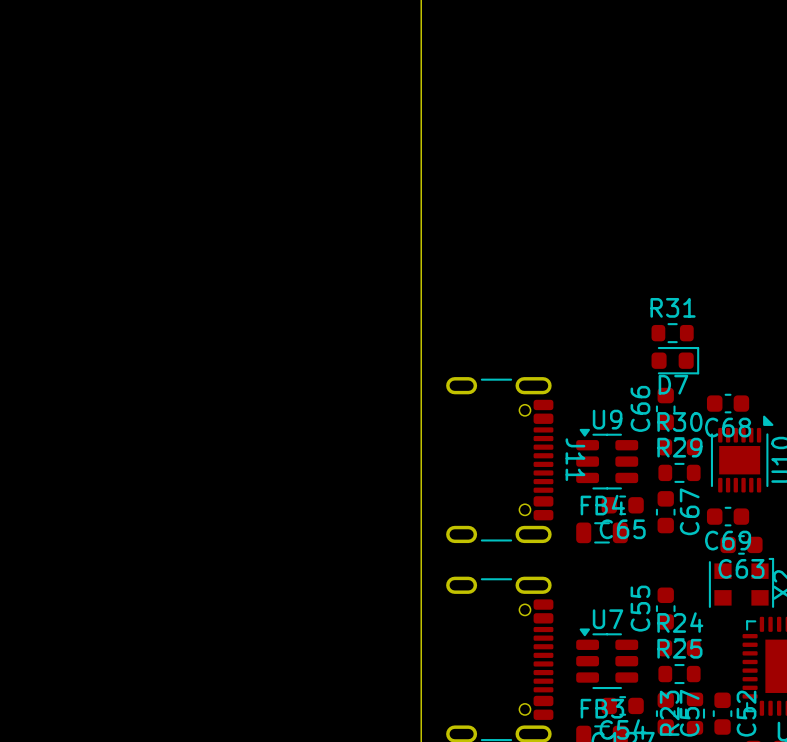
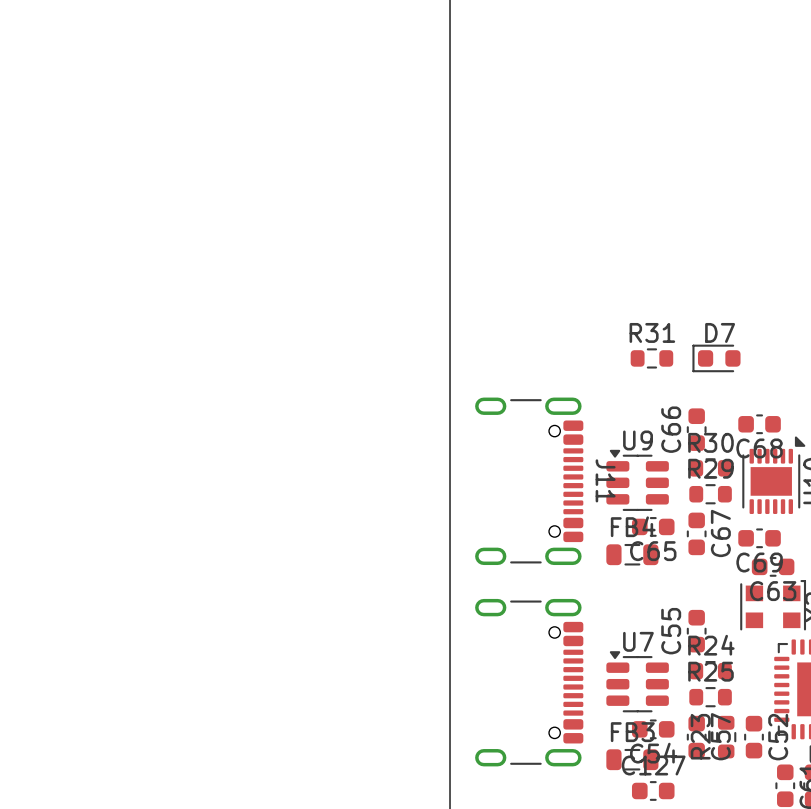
R31 position: (672, 333) -> (651, 358)
D7 rotation: 0° (675, 360) -> 180° (716, 358)

